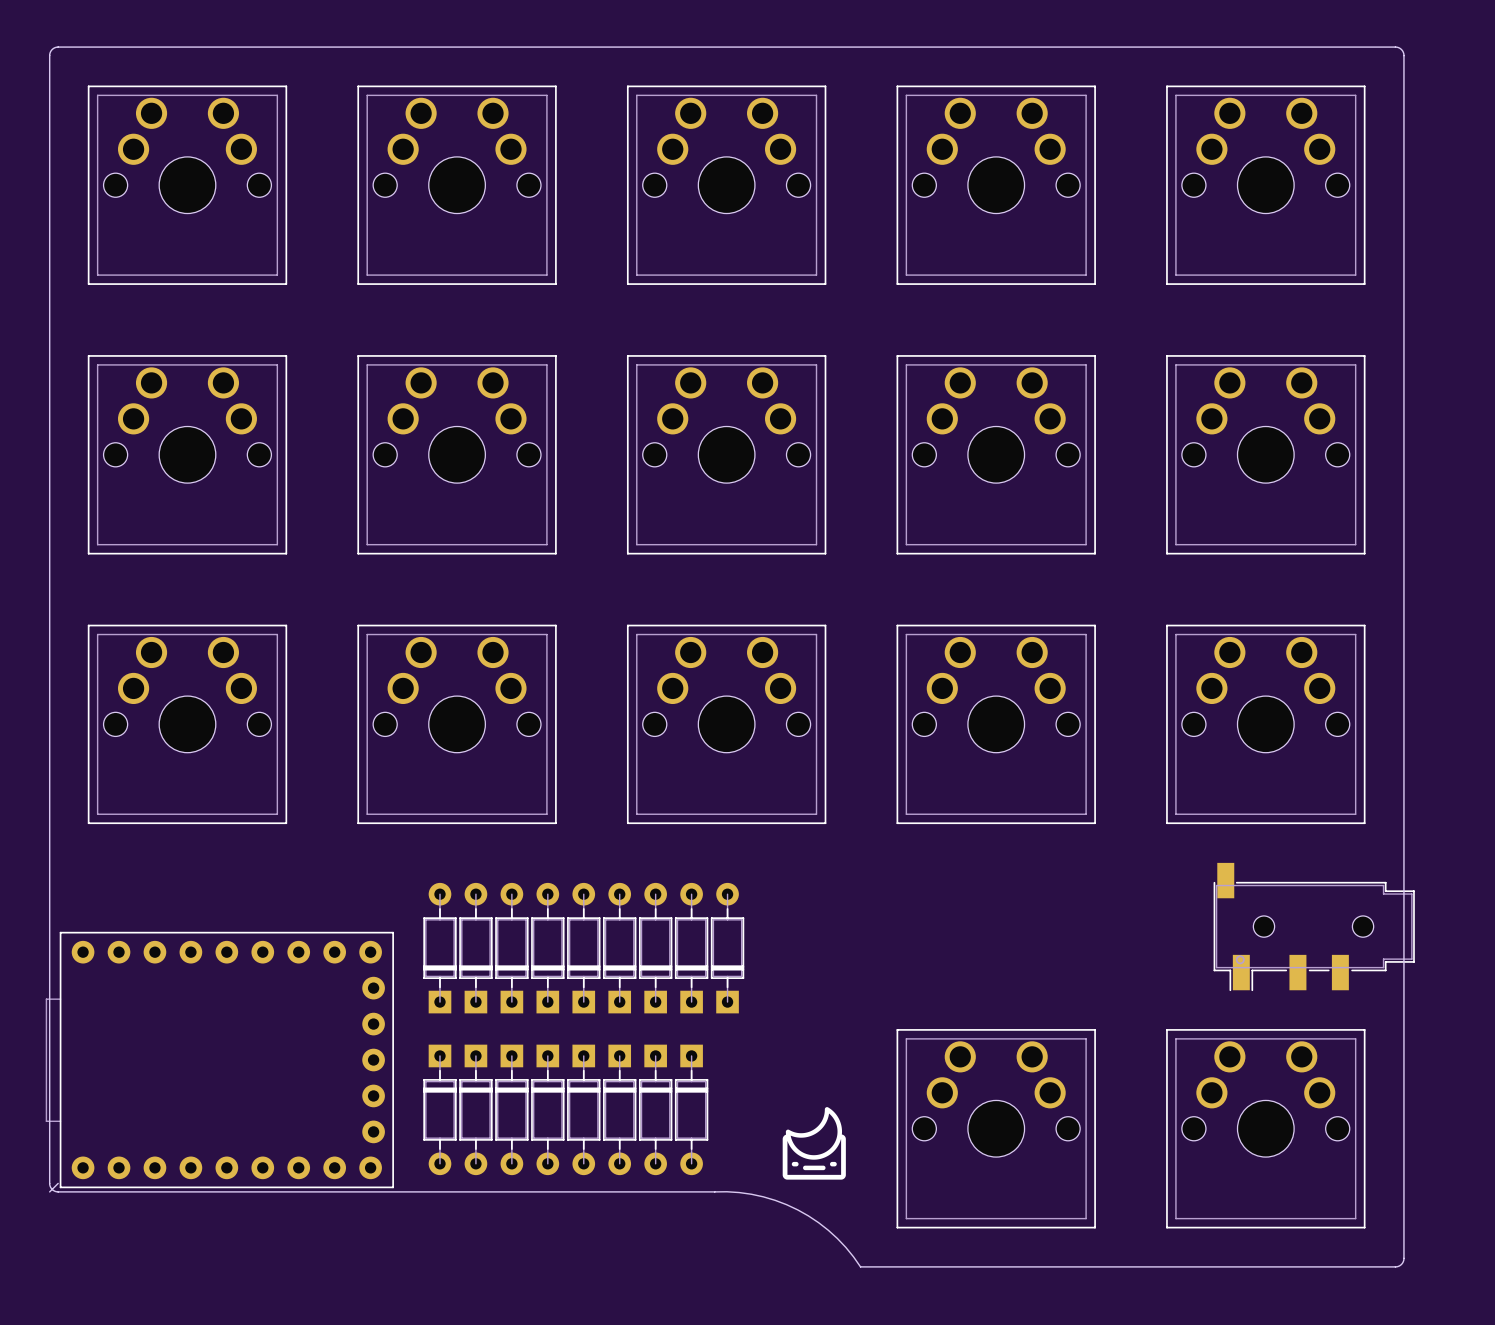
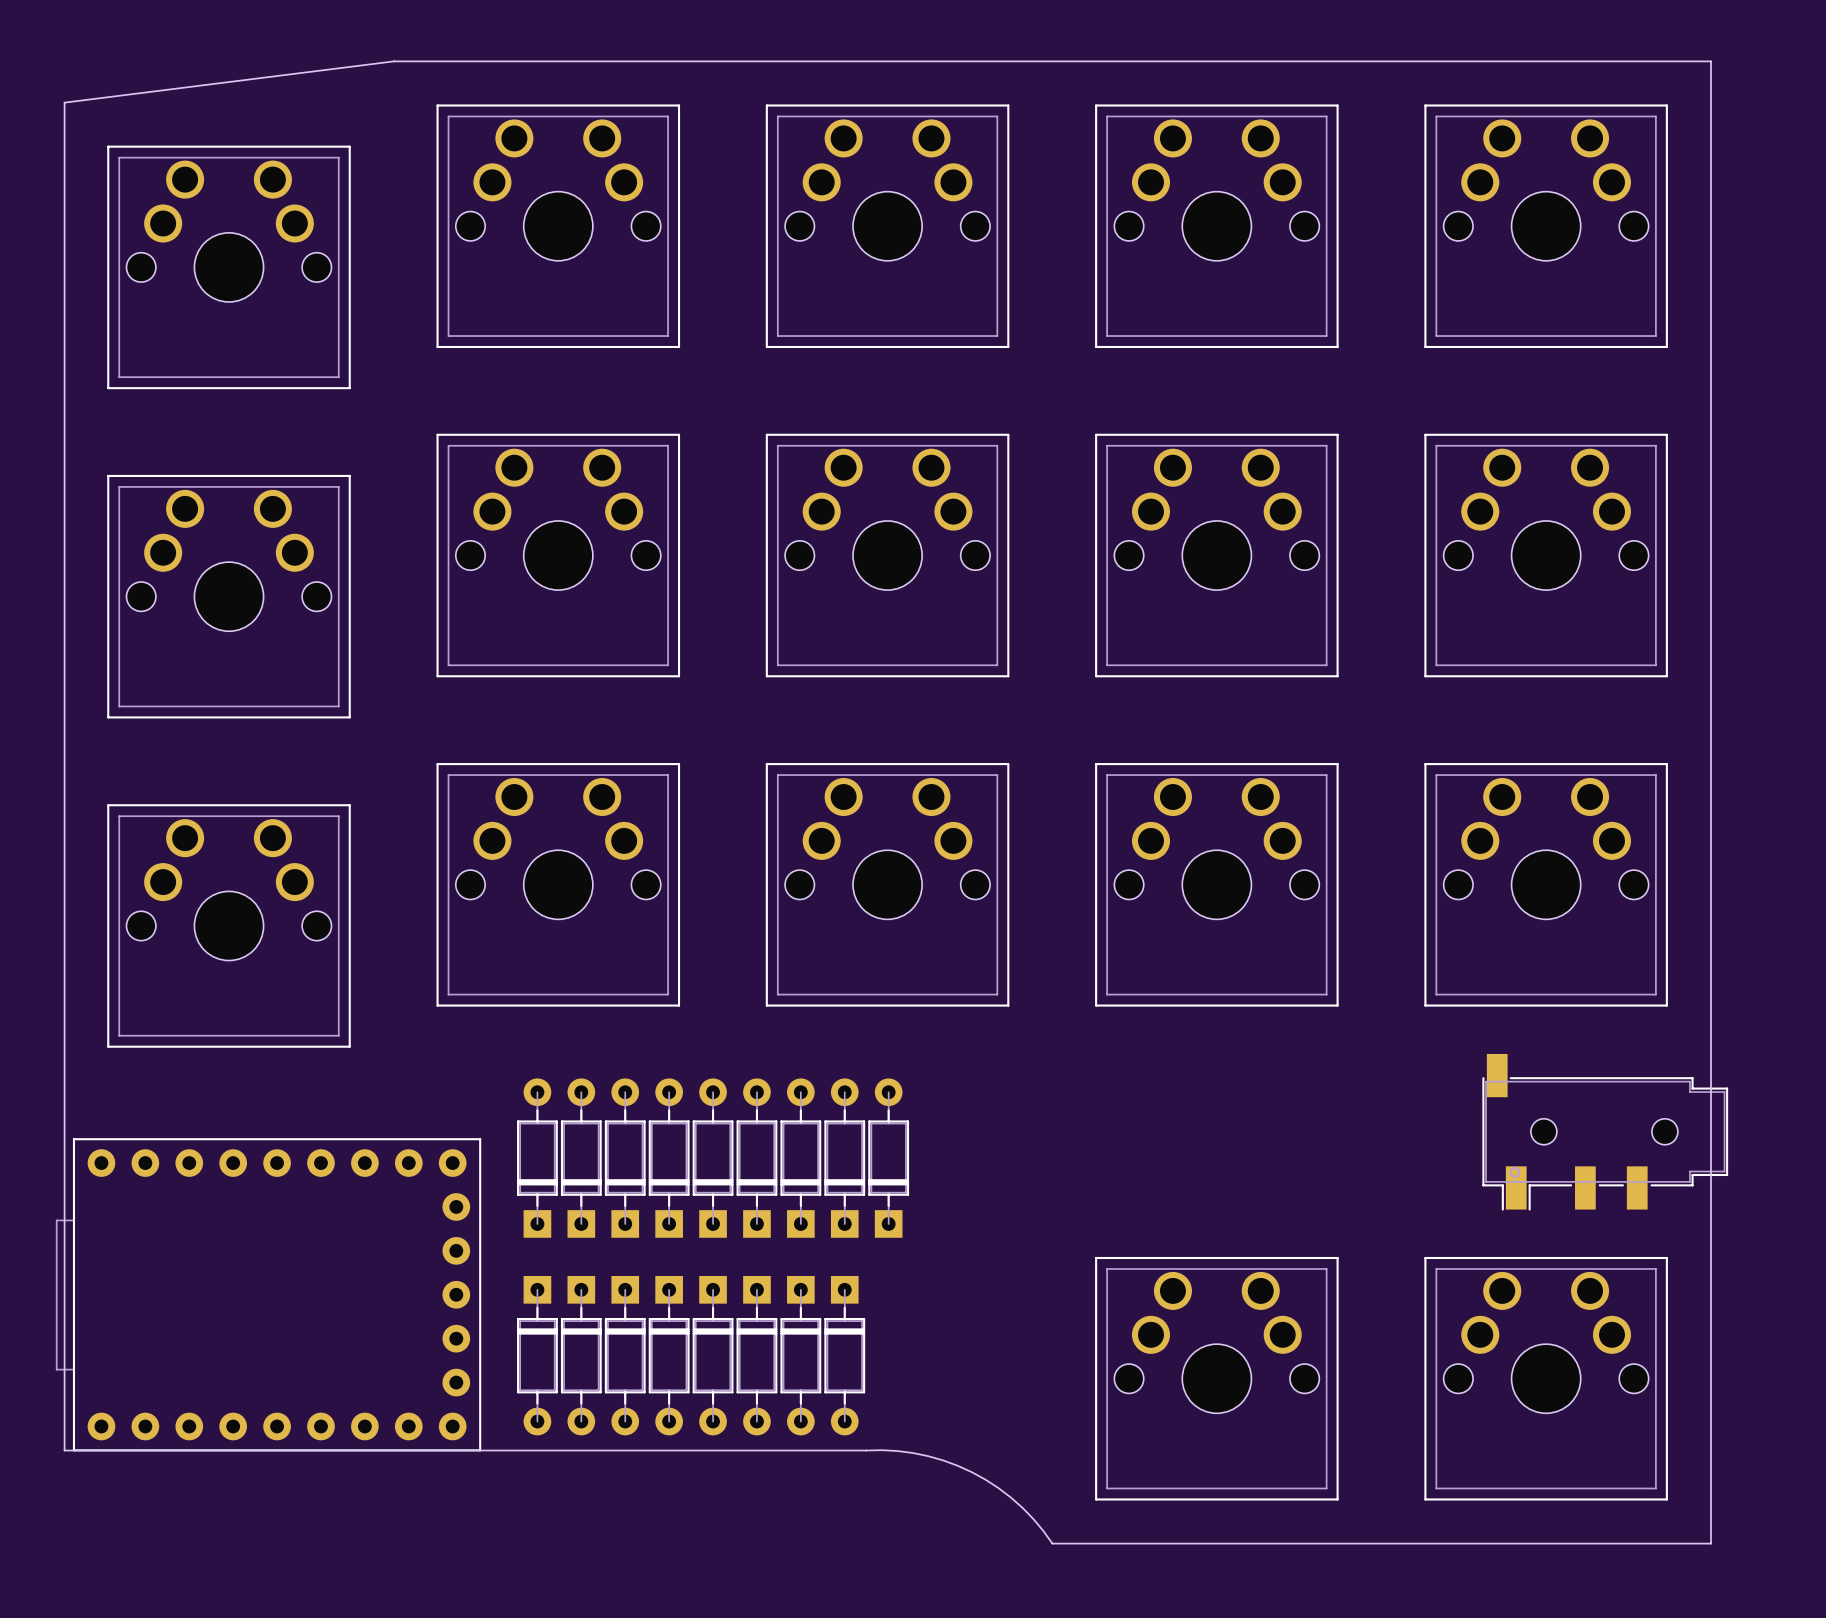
board edge: (58, 47) (1395, 47) (1401, 49) (1403, 55) (1403, 1258) (1401, 1264) (1395, 1266) (860, 1266) (837, 1238) (808, 1215) (775, 1200) (751, 1194) (727, 1191) (58, 1191) (52, 1189) (49, 1183) (49, 55) (52, 49) (58, 47) -> (393, 61) (64, 102) (64, 1450) (897, 1451) (943, 1460) (985, 1479) (1022, 1507) (1052, 1543) (1711, 1543) (1711, 61) (393, 61)
part position: (187, 185) -> (229, 267)
part position: (187, 454) -> (229, 596)
part position: (187, 724) -> (229, 925)
drawing: [782, 1107, 846, 1180] -> none
board edge: (58, 1183) (49, 1191) -> none

